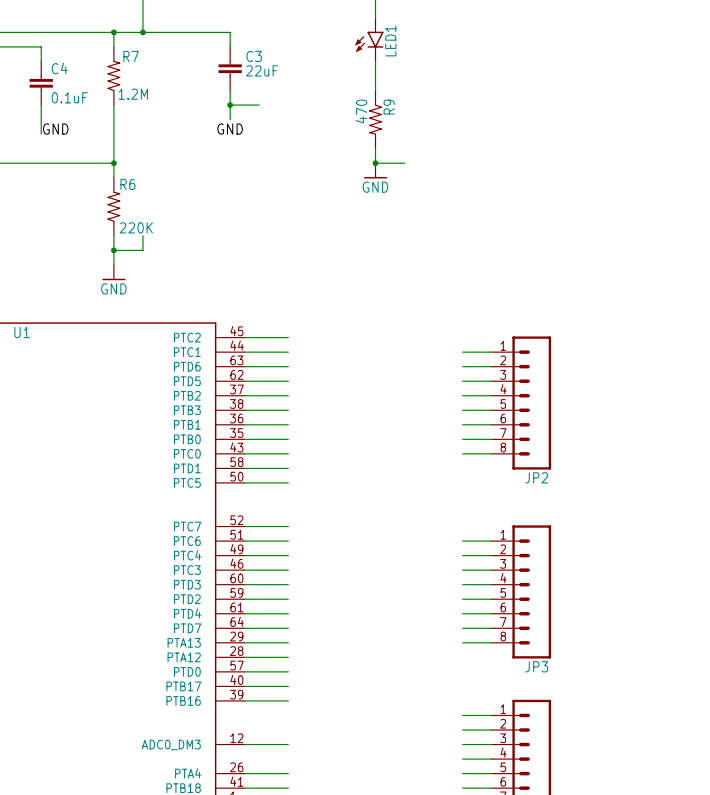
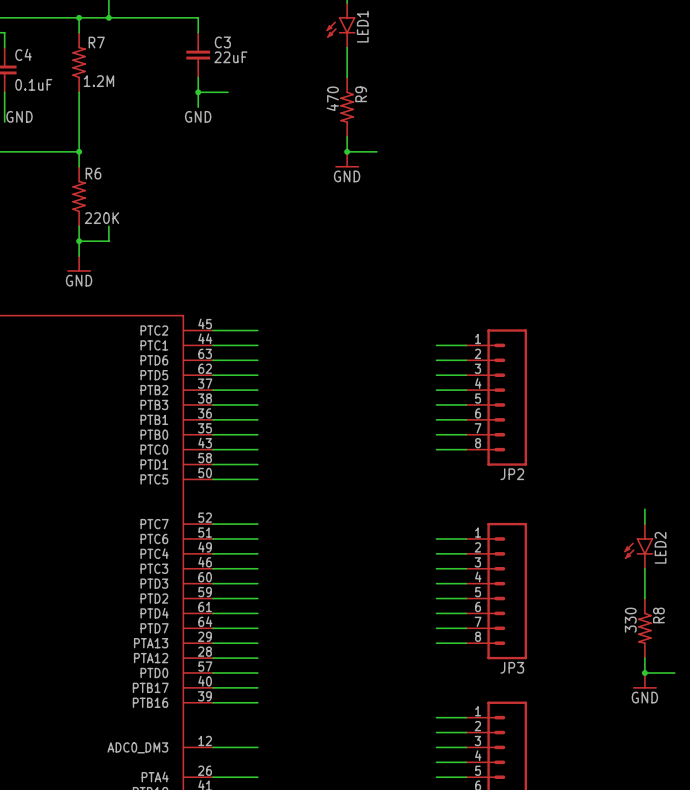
wire: none -> (644, 509) (644, 524)
LED2: none -> (638, 546)
wire: none -> (644, 568) (644, 598)
R8: none -> 330 (644, 628)
wire: none -> (644, 658) (644, 672) (674, 672)
junction: none -> (644, 672)
power symbol: none -> GND (644, 680)

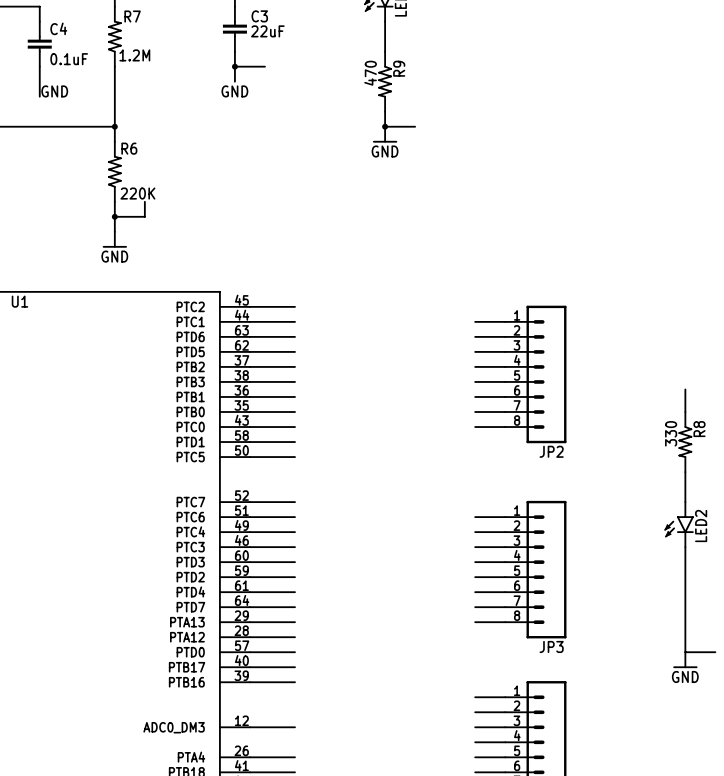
wire: none -> (685, 389) (685, 412)
wire: none -> (685, 472) (685, 487)
R8 position: (644, 628) -> (685, 442)
junction: (644, 672) -> none

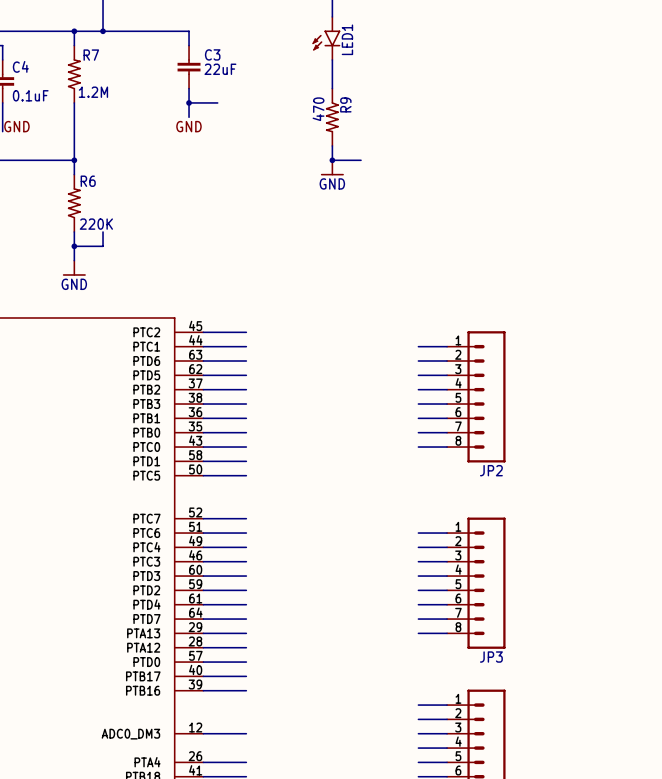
wire: (685, 389) (685, 412) -> none
R8: 330 (685, 442) -> none
wire: (685, 472) (685, 502) -> none
LED2: (679, 524) -> none
wire: (685, 547) (685, 652) (715, 652) -> none
power symbol: GND (685, 660) -> none

